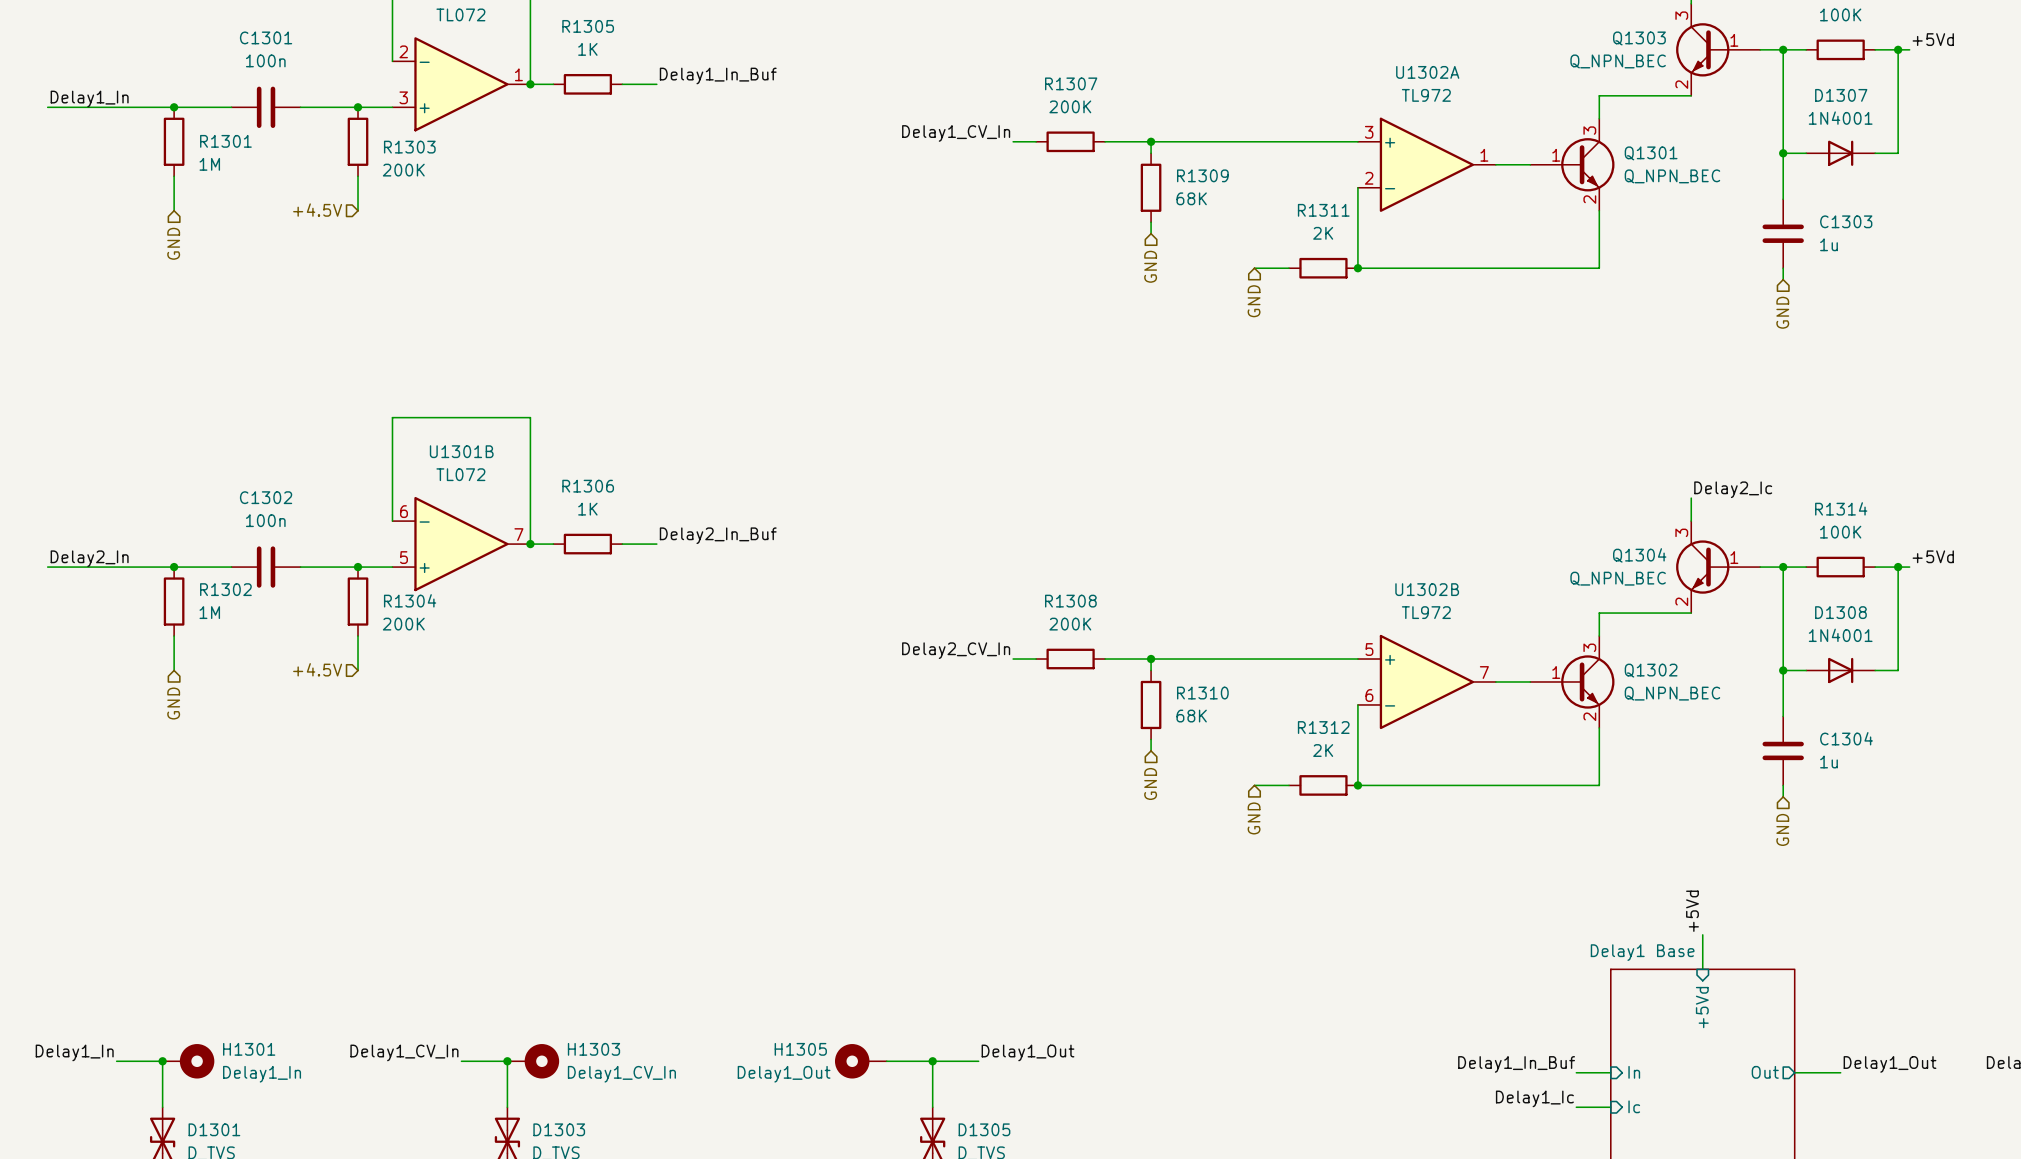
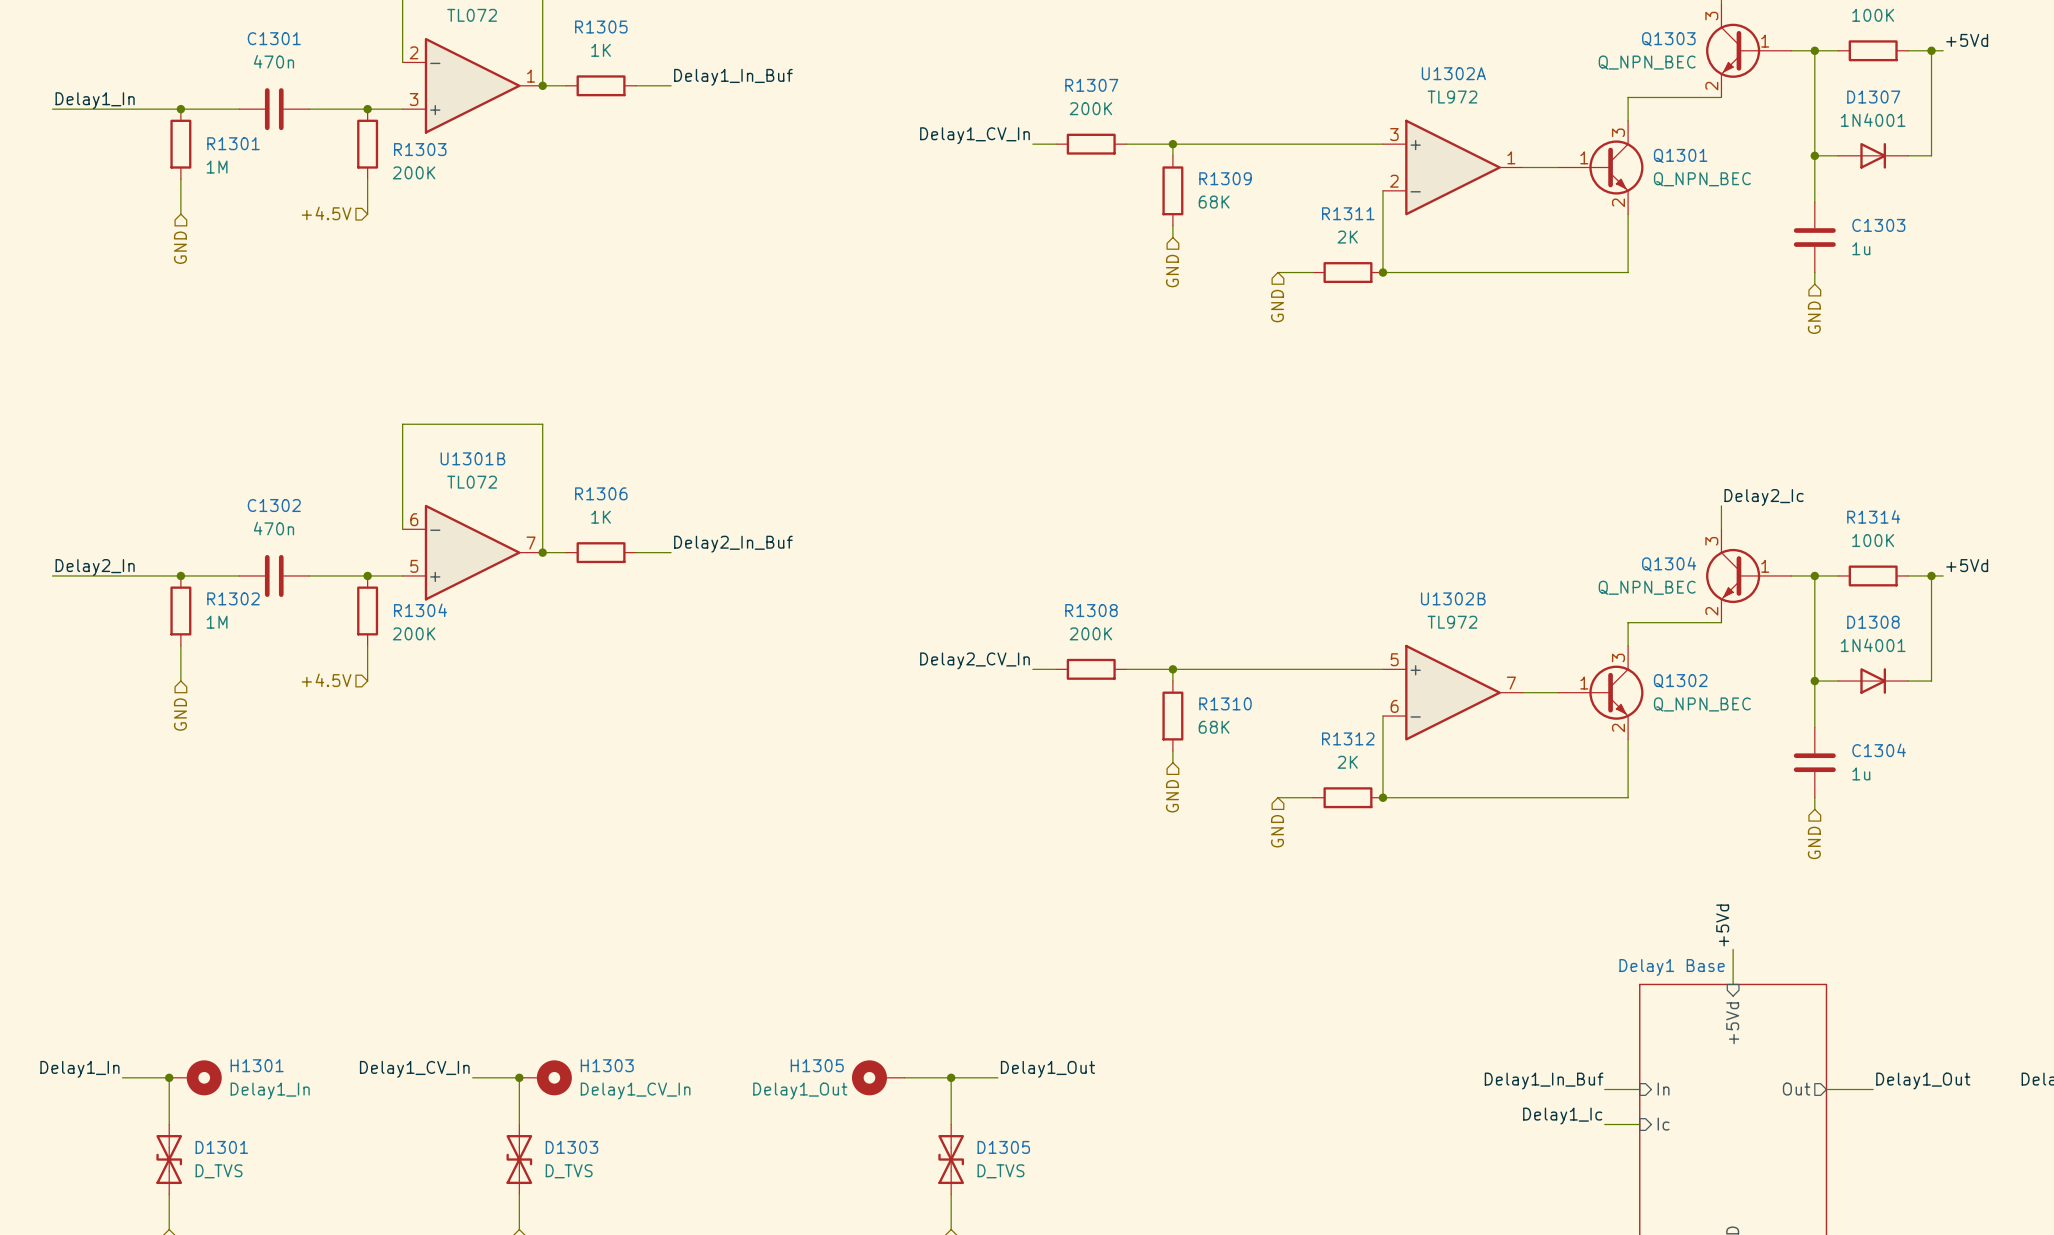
C1301 value: 100n (265, 60) -> 470n (273, 61)
C1302 value: 100n (265, 520) -> 470n (273, 528)

